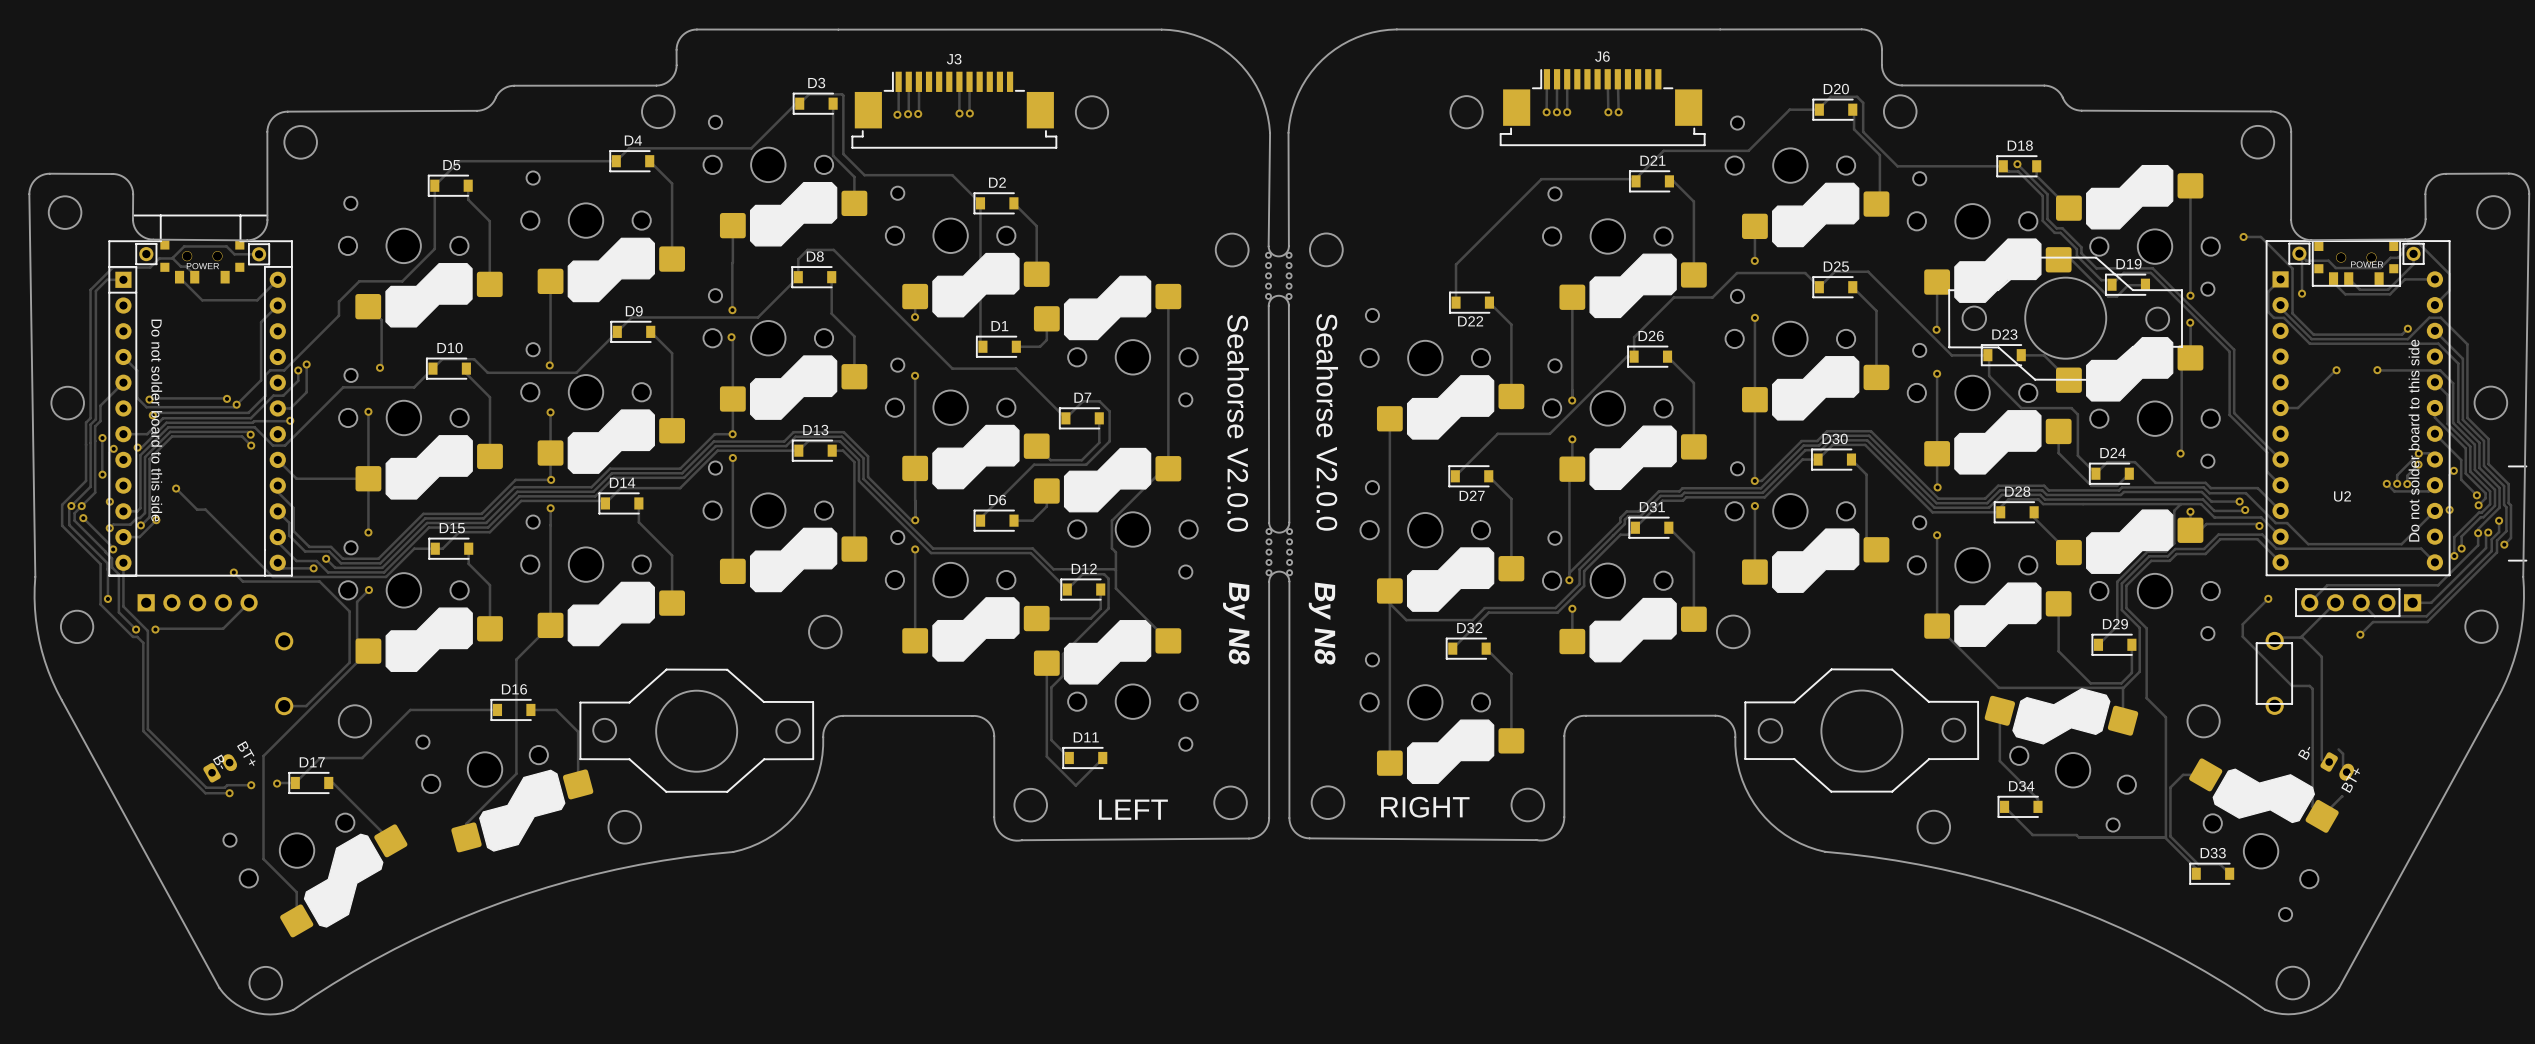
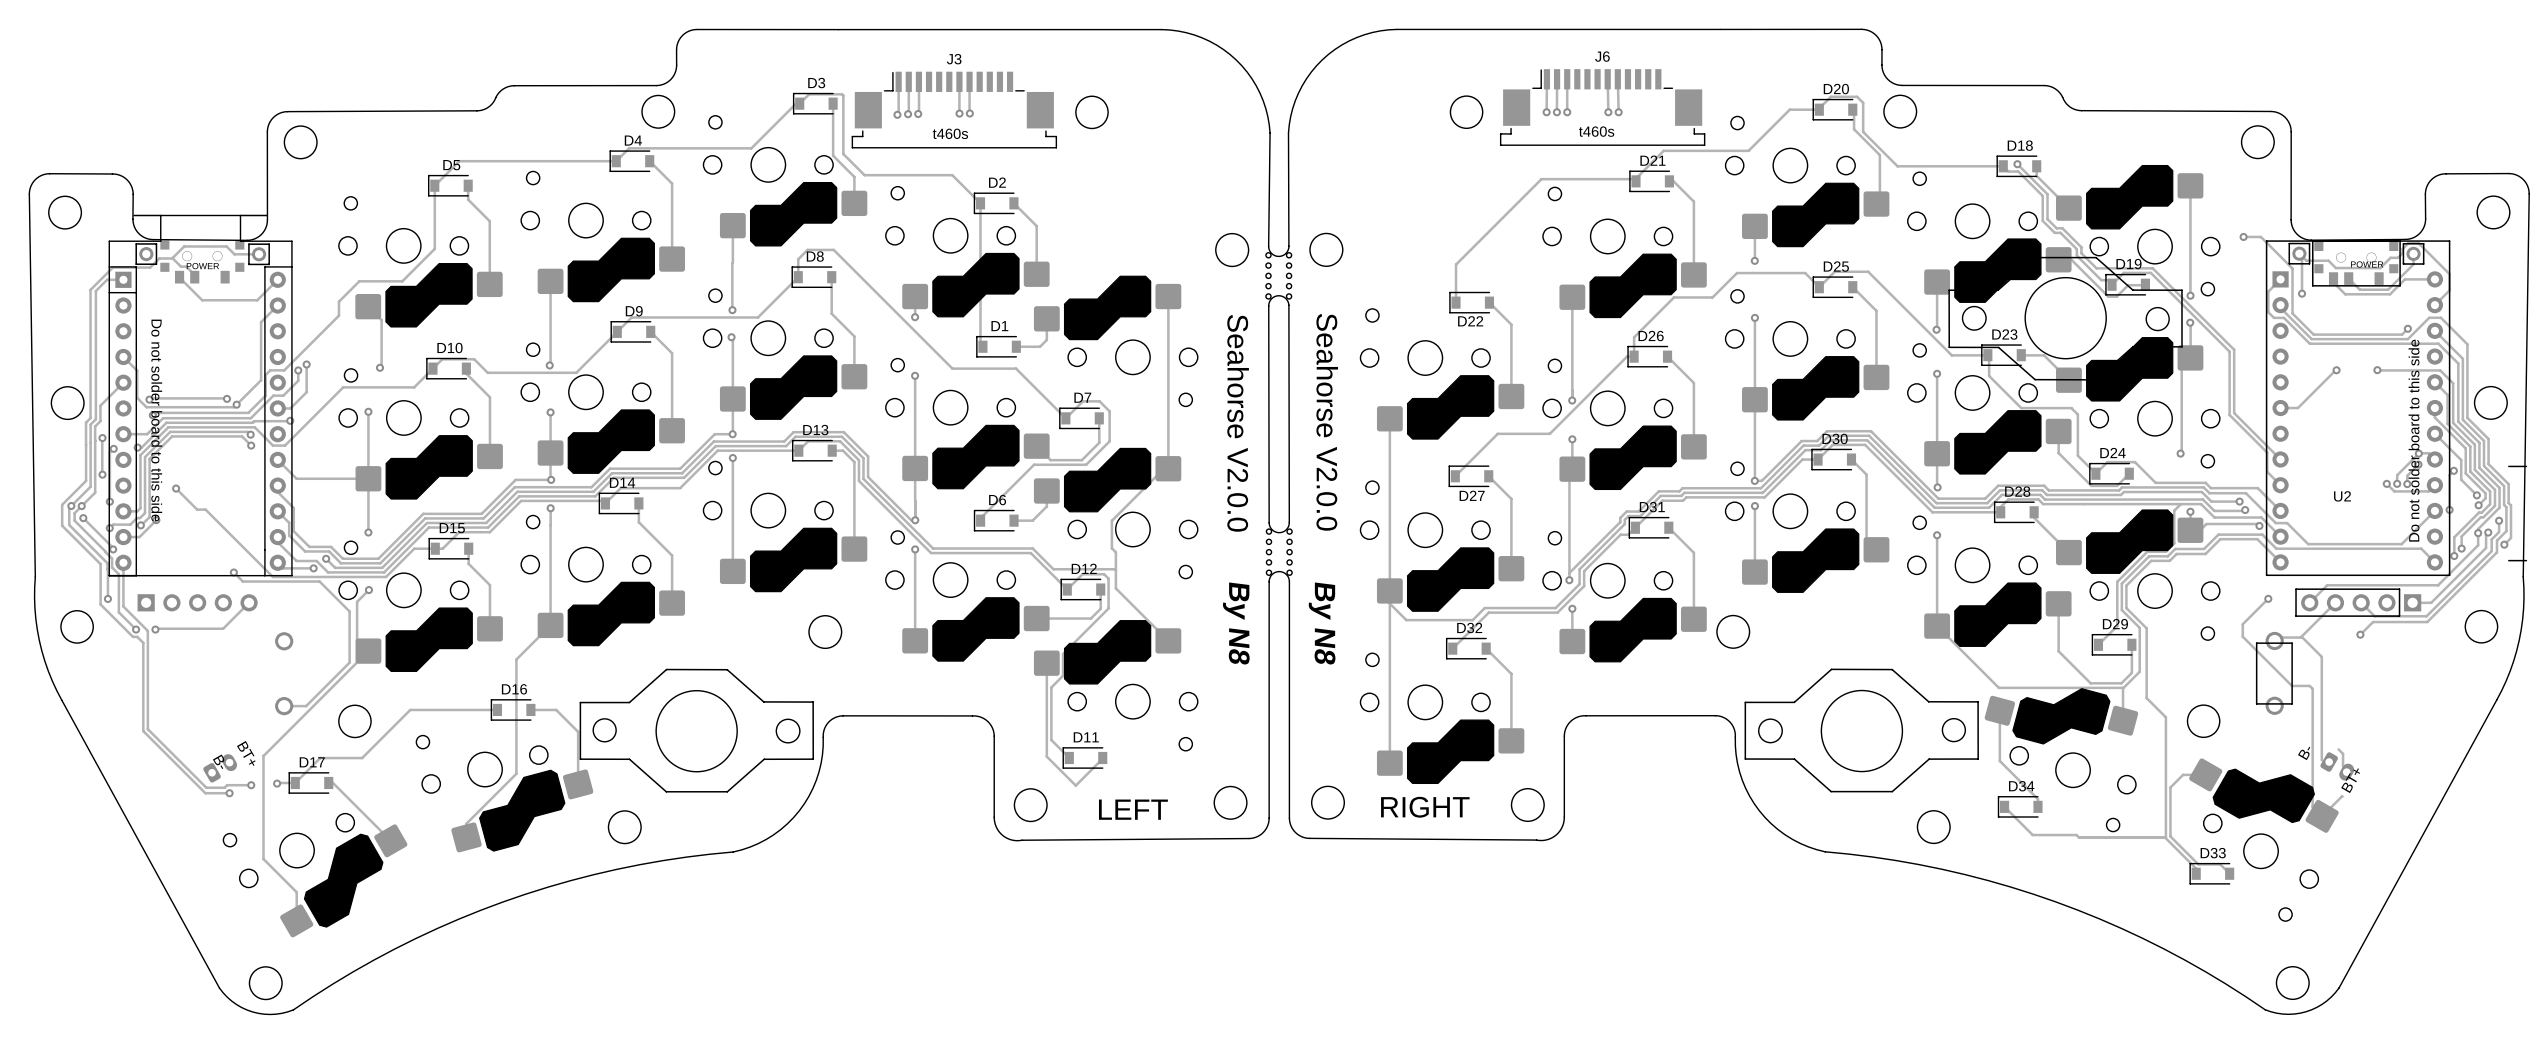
text: none -> t460s (1596, 131)
text: none -> t460s (950, 133)

